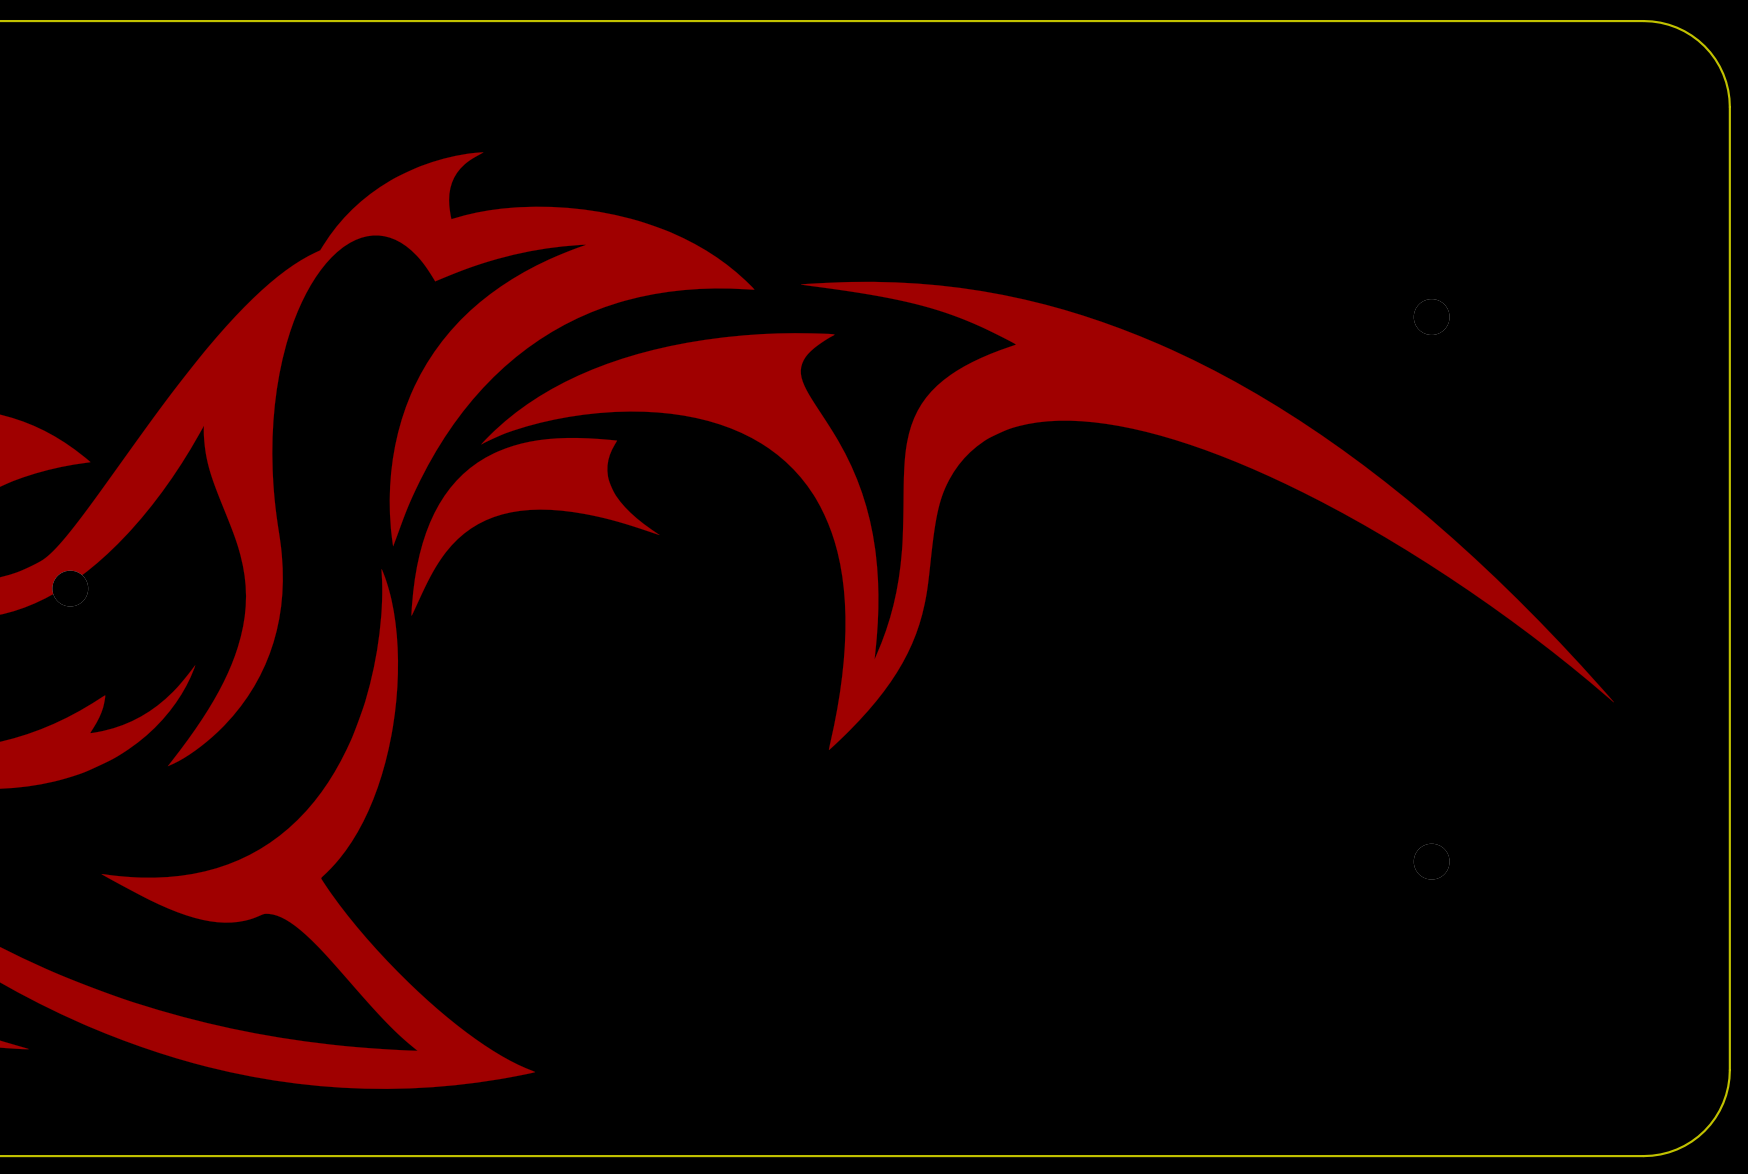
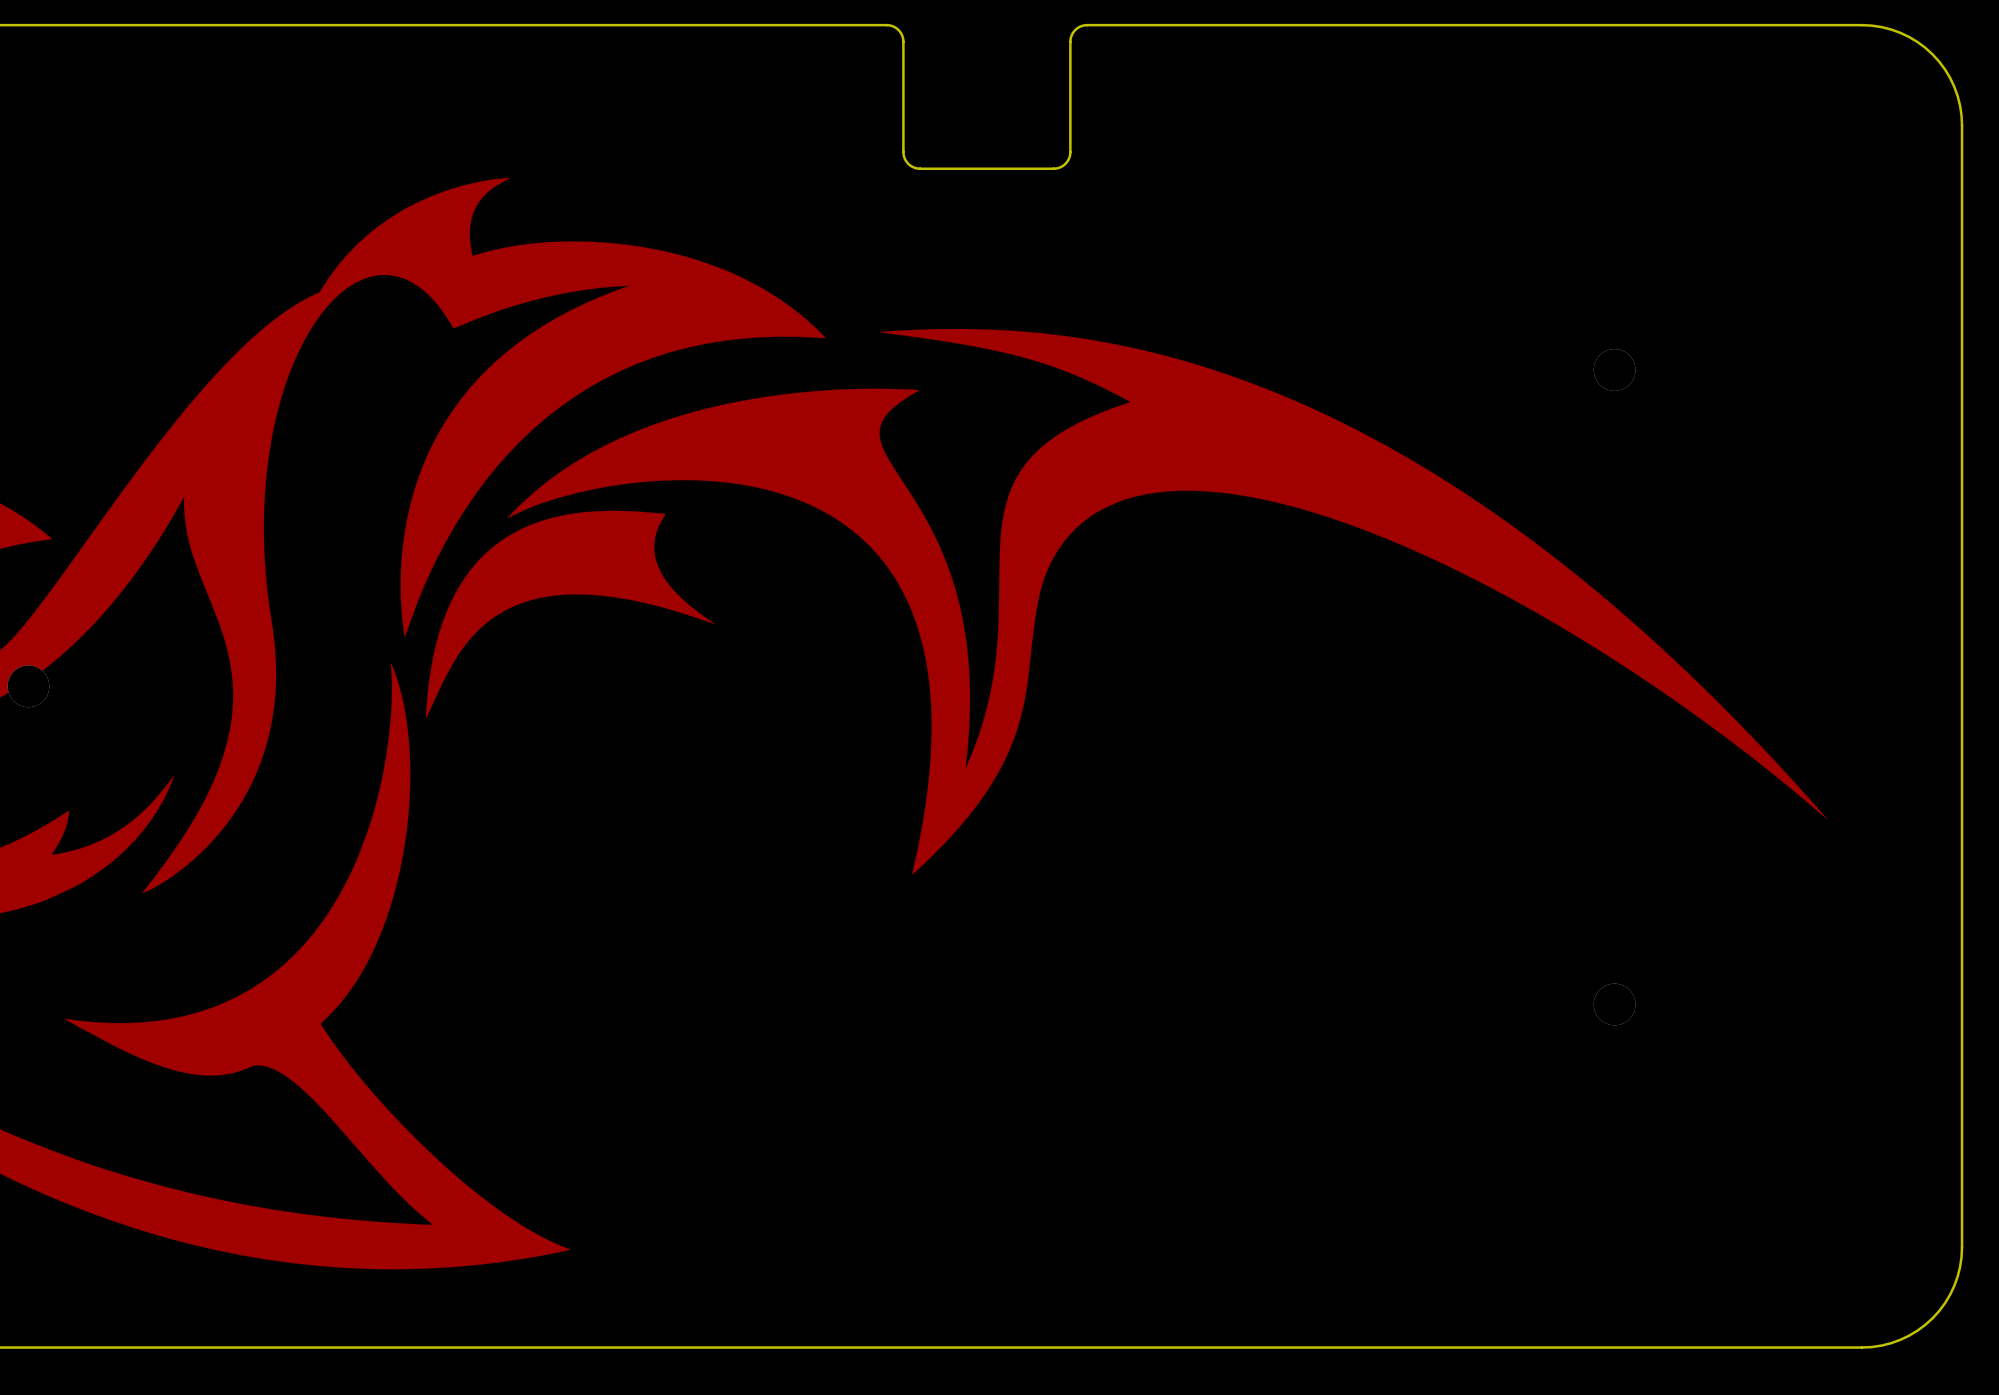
board edge: (806, 21) (978, 21) -> (886, 25) (898, 30) (903, 39) (903, 156) (909, 165) (920, 168) (1053, 168) (1063, 165) (1068, 160) (1070, 152) (1070, 39) (1075, 30) (1087, 25)

